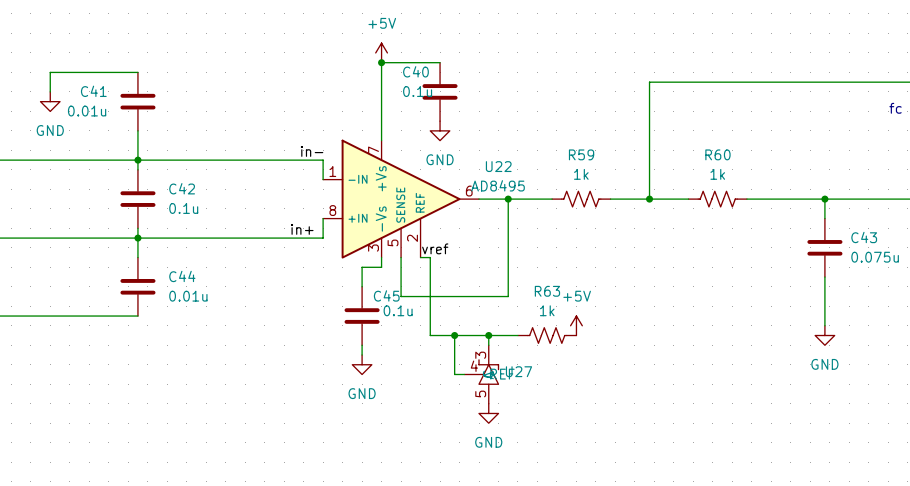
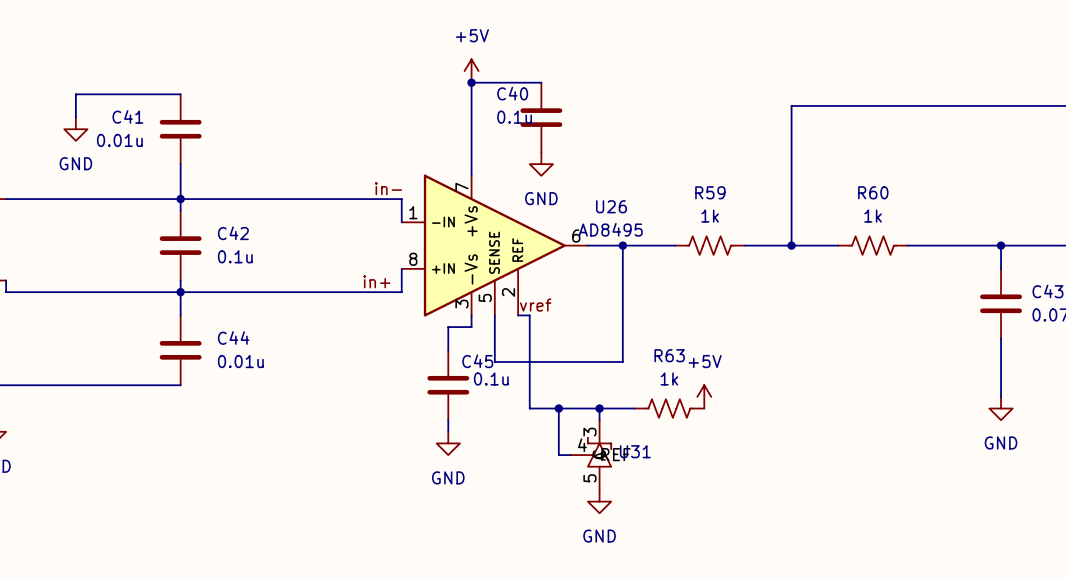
U22 name: U22 (498, 166) -> U26 (611, 206)
U27 name: U27 (518, 371) -> U31 (635, 451)

